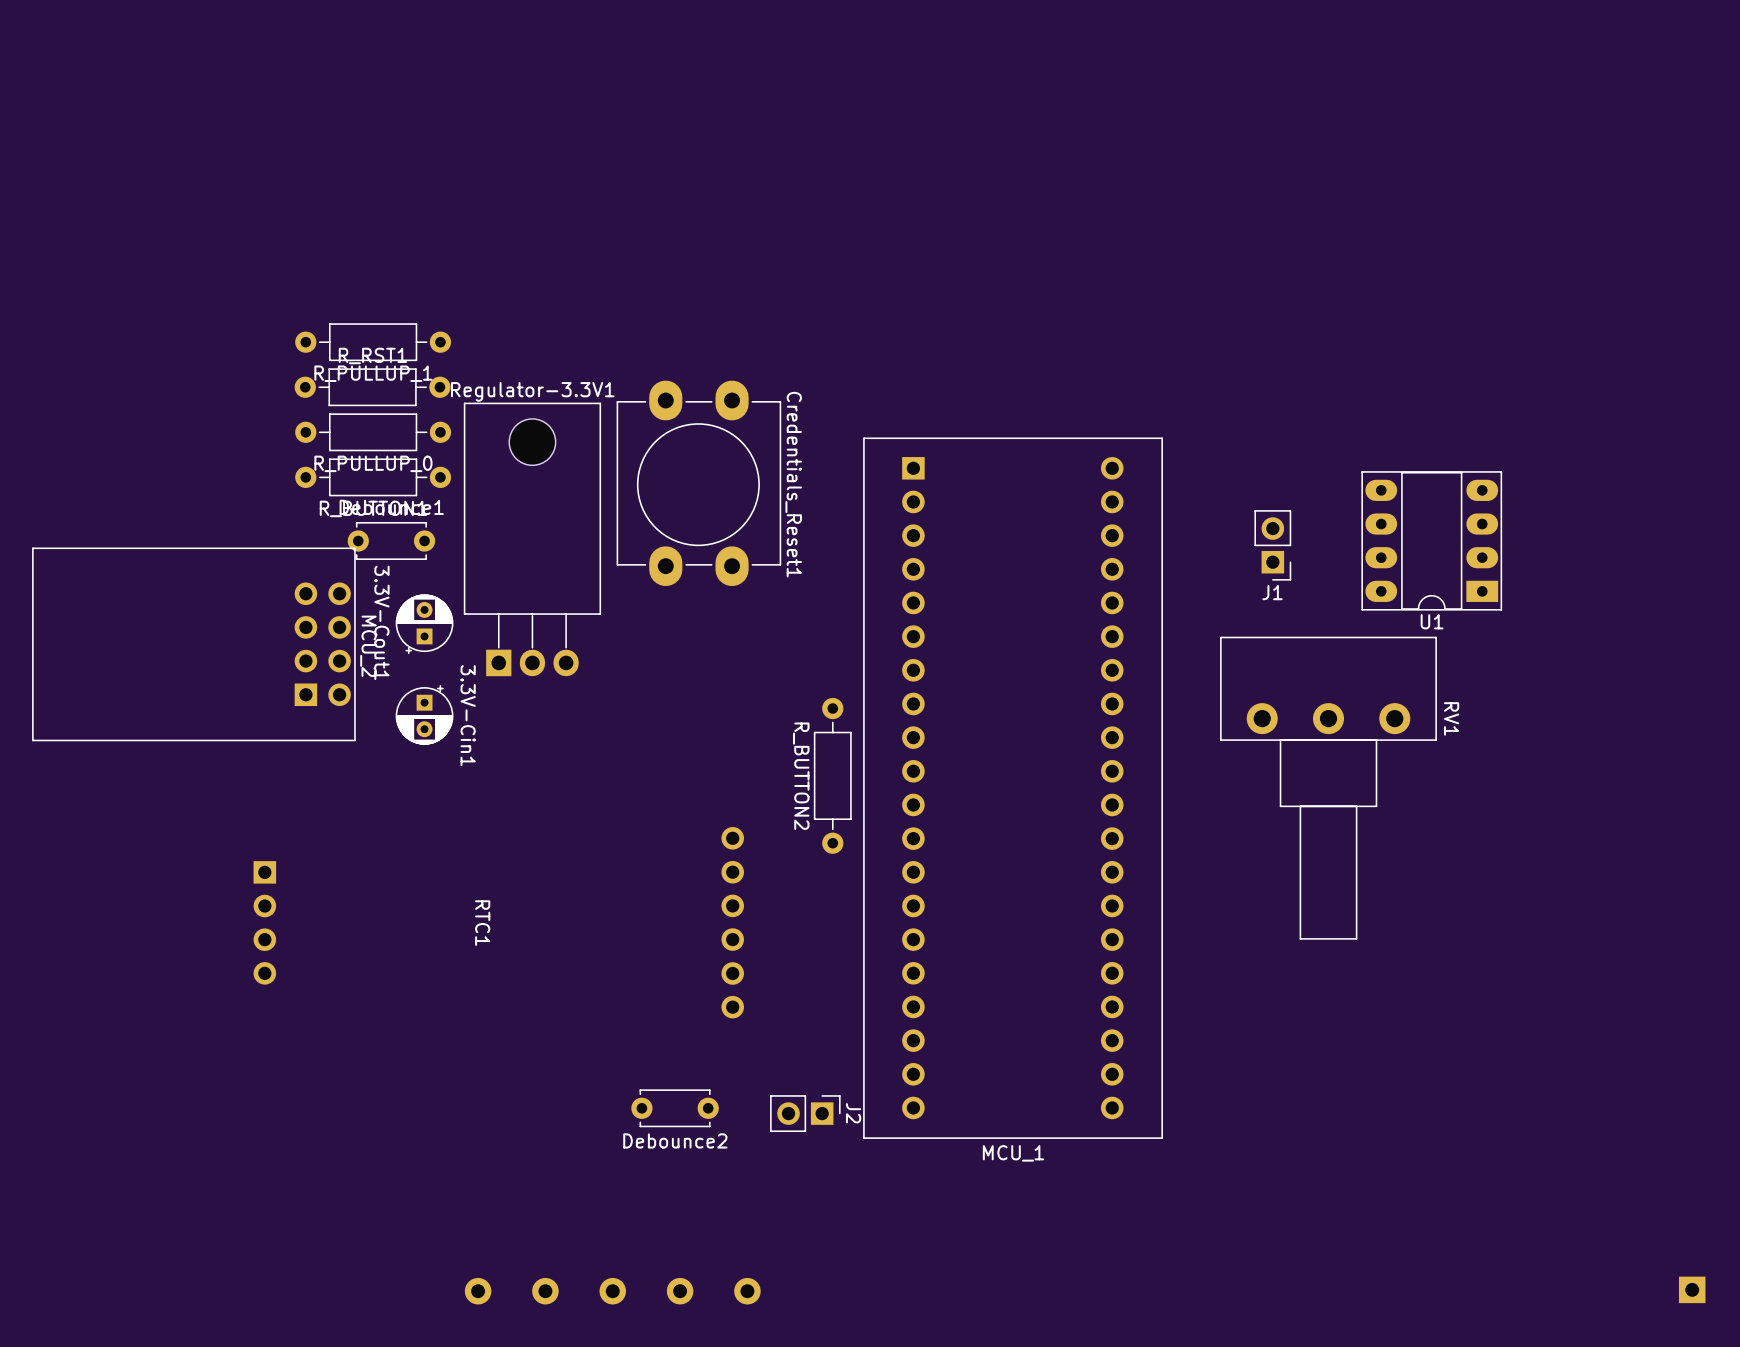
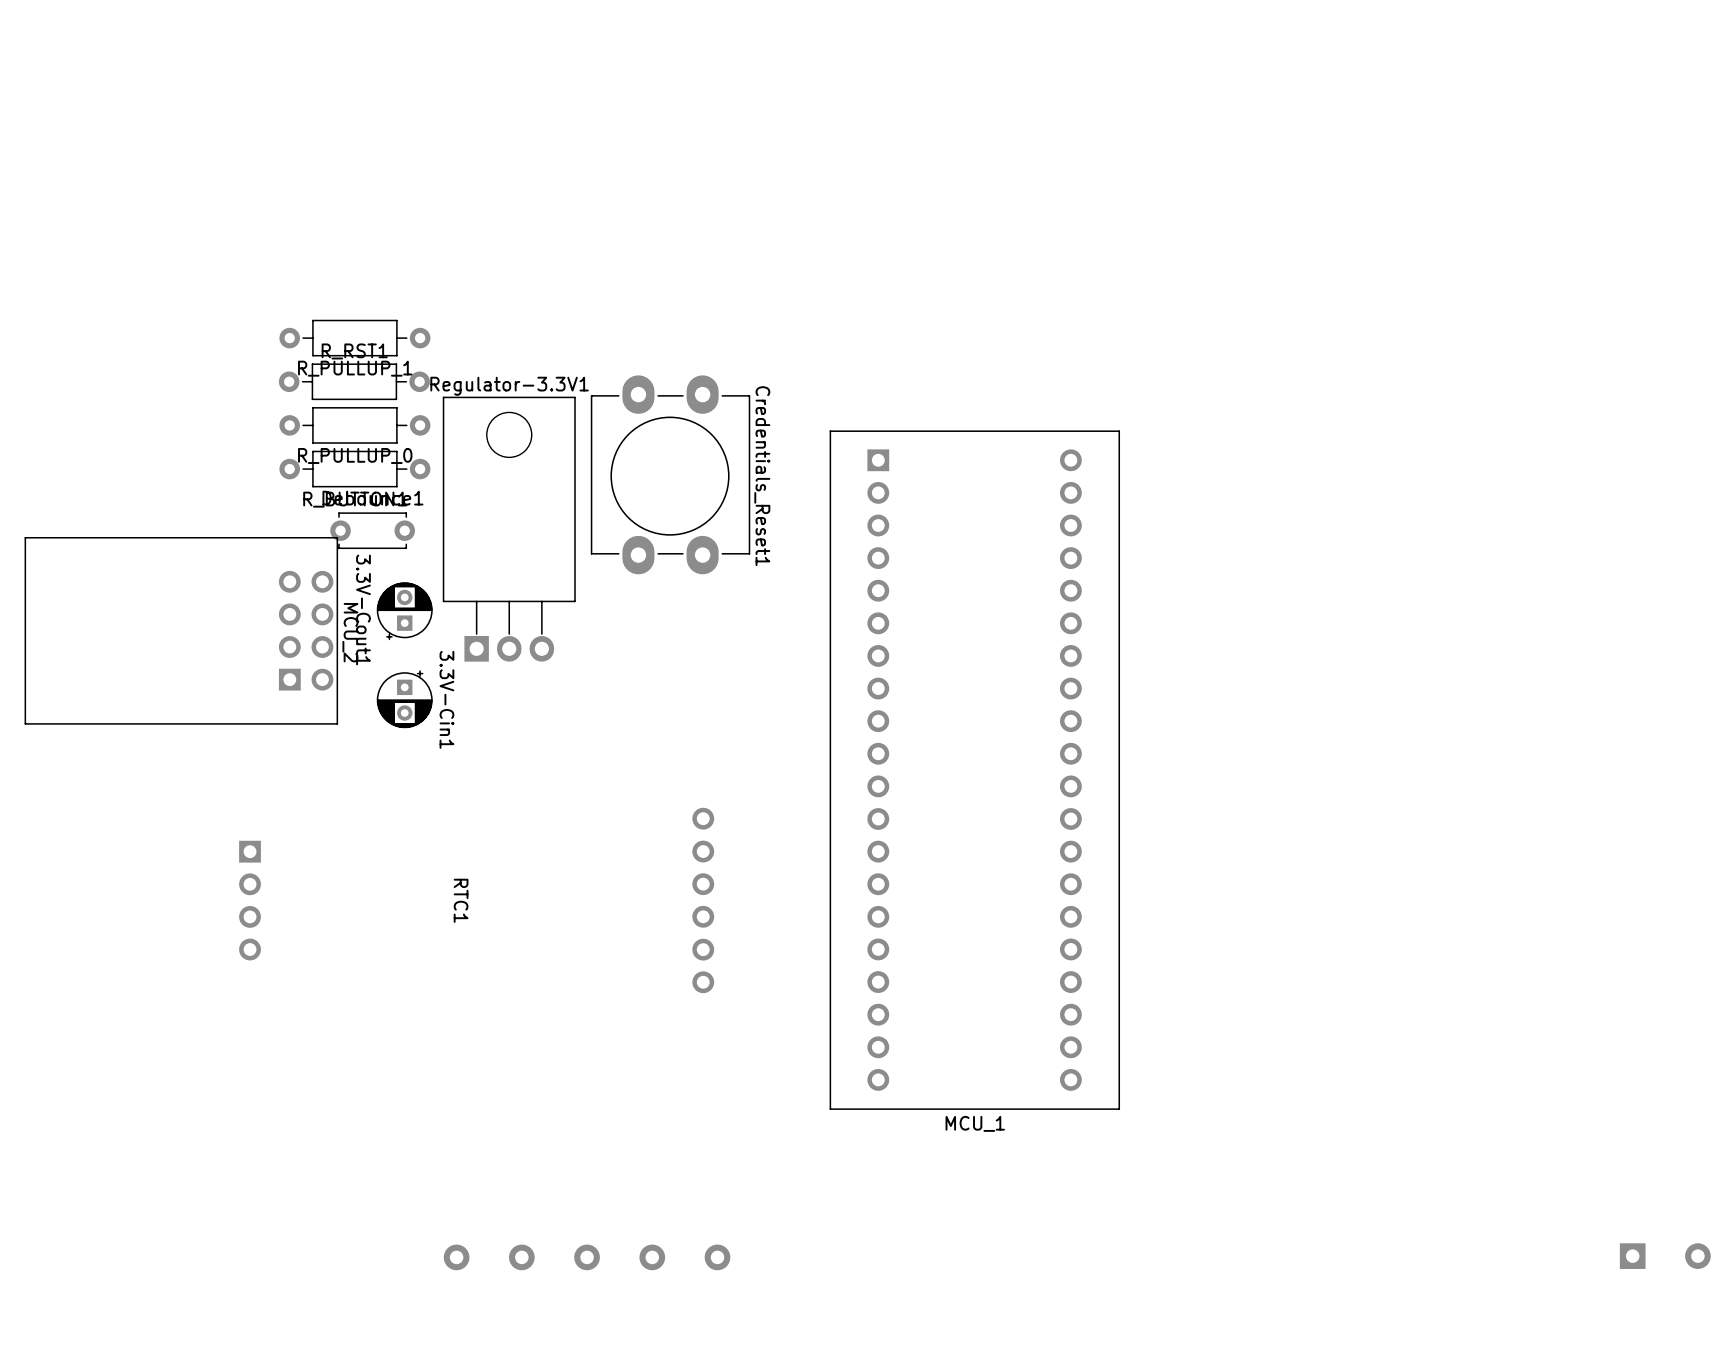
U1: (1431, 540) -> none
J1: (1272, 545) -> none
R_BUTTON2: (832, 775) -> none
RV1: (1328, 788) -> none
Debounce2: (675, 1108) -> none
J2: (805, 1113) -> none

